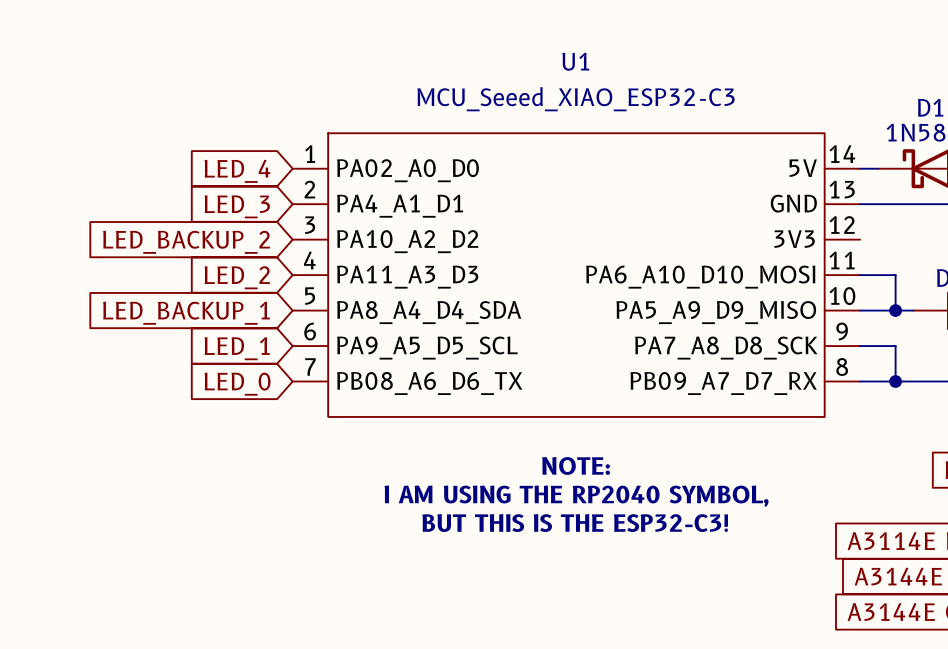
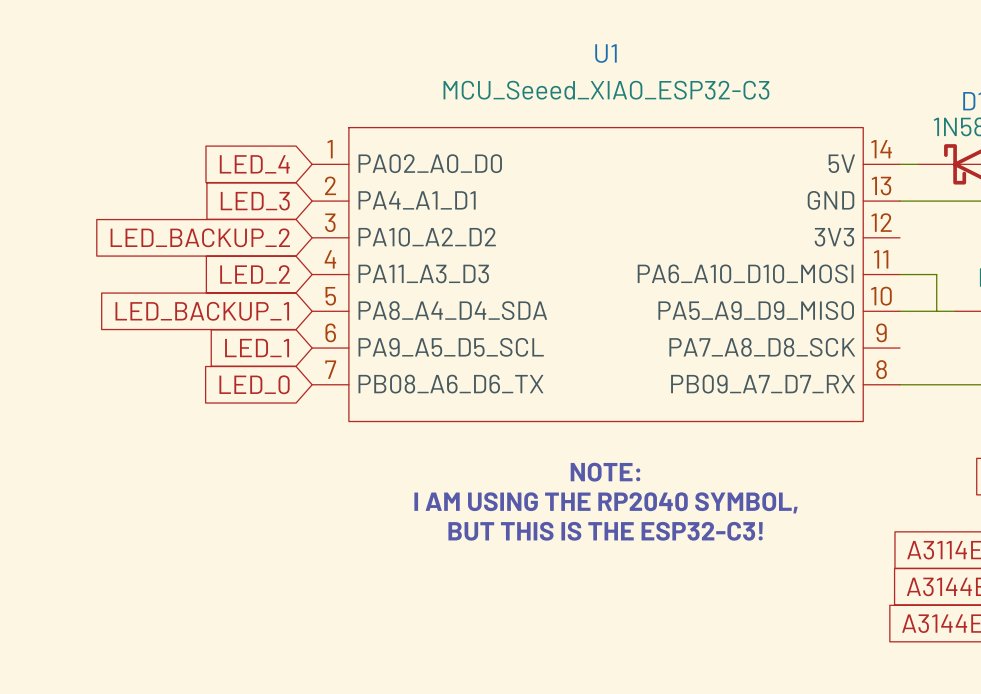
junction: (895, 310) -> none
wire: (860, 346) (895, 346) (895, 381) -> none
junction: (895, 381) -> none

